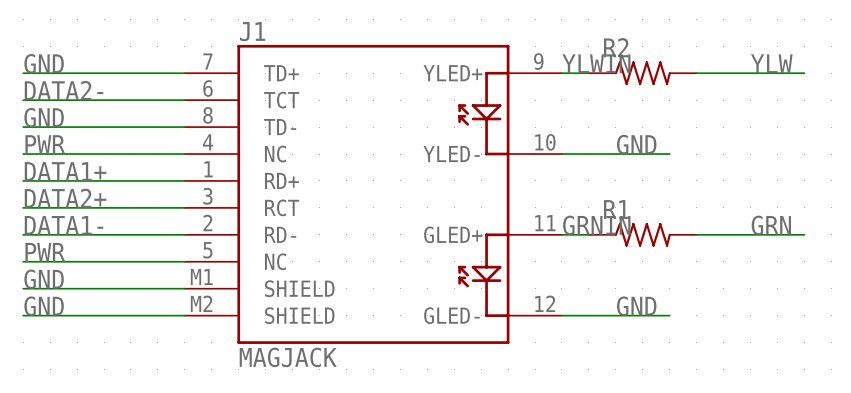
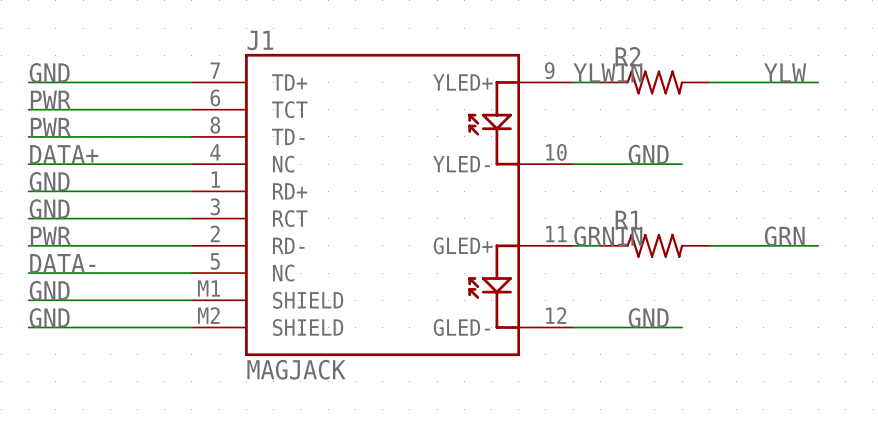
label: DATA2- (64, 90) -> PWR (50, 100)
label: GND (44, 117) -> PWR (50, 127)
label: PWR (45, 144) -> DATA+ (64, 154)
label: DATA1+ (65, 171) -> GND (49, 181)
label: DATA2+ (65, 198) -> GND (49, 209)
label: DATA1- (64, 225) -> PWR (50, 236)
label: PWR (45, 252) -> DATA- (62, 263)

